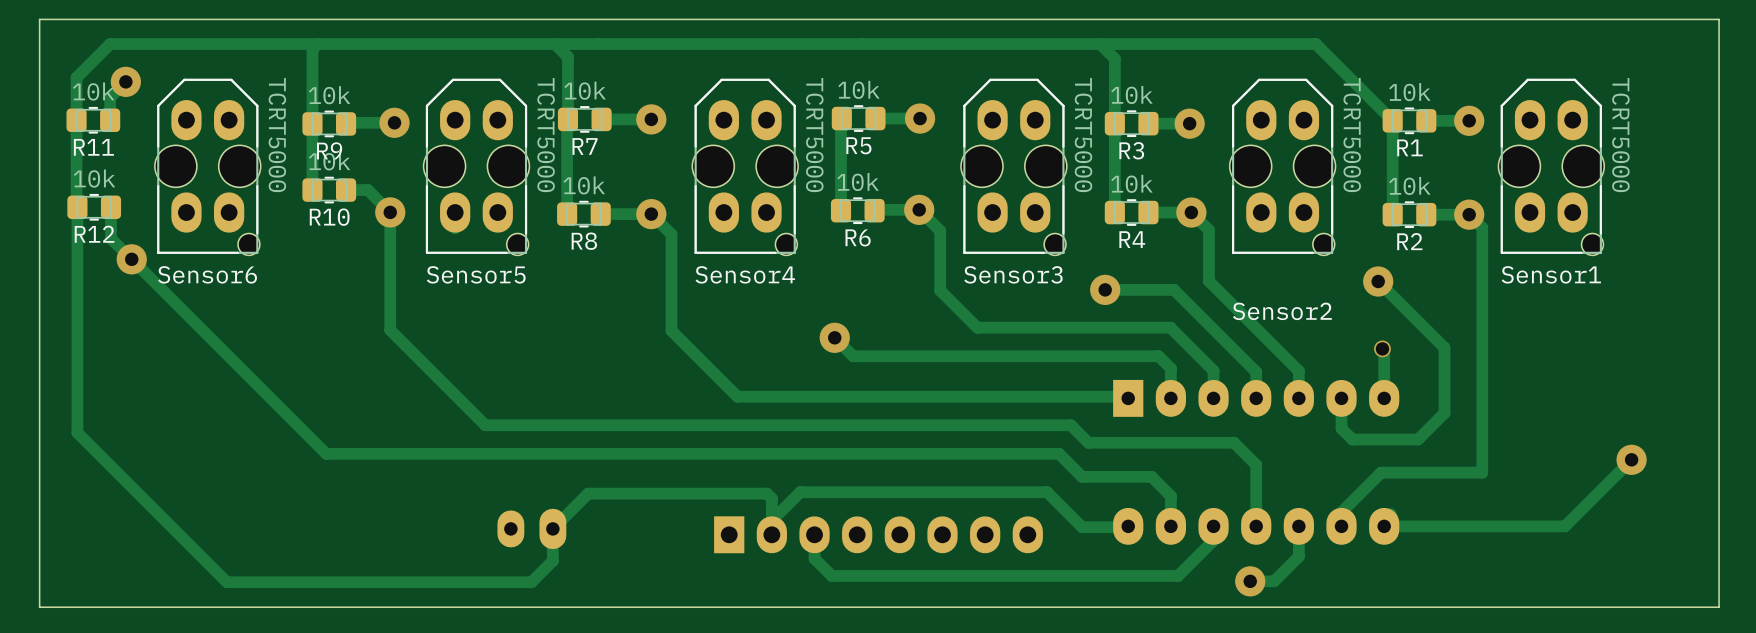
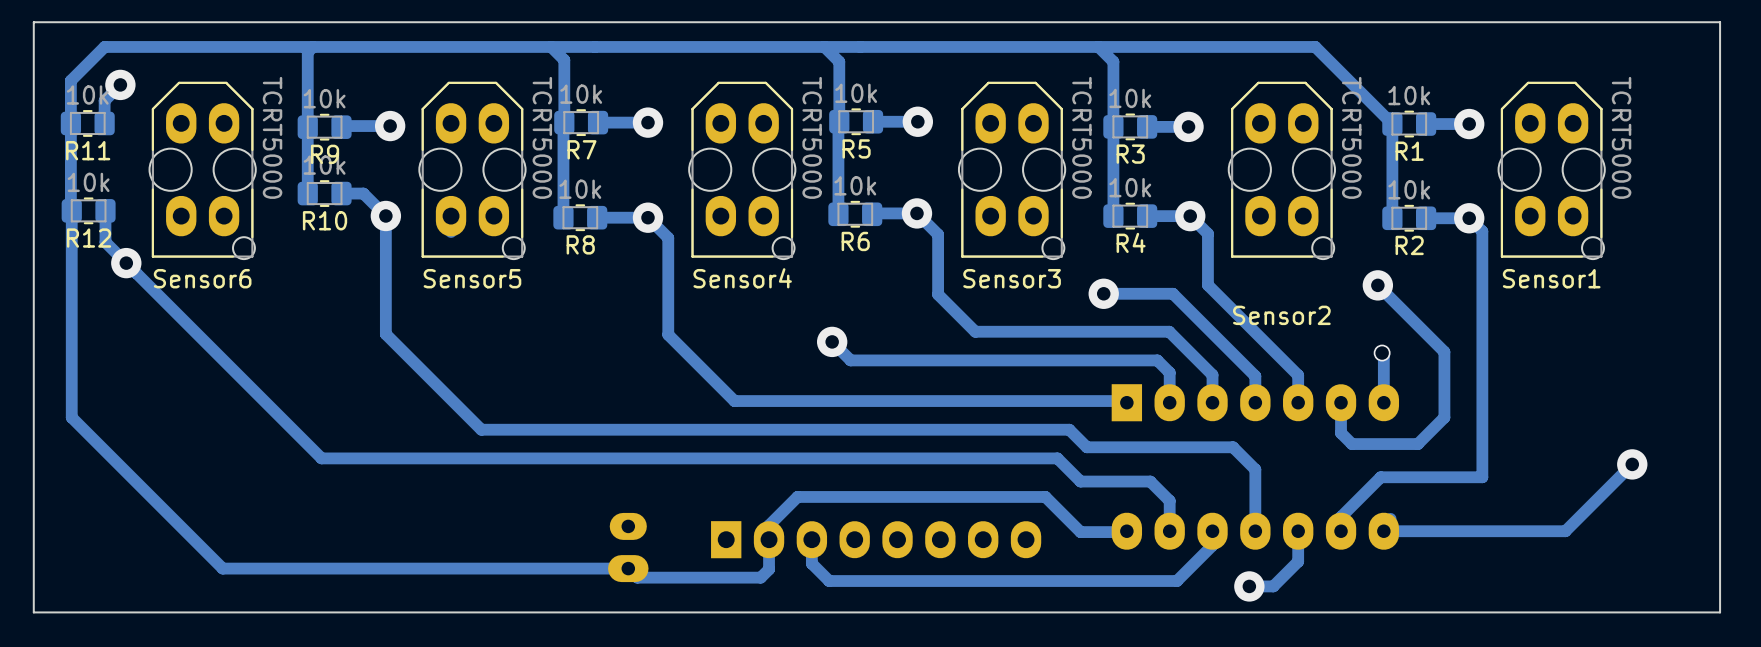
track: none -> (824, 46) (839, 61) (839, 121)
track: (77, 413) (77, 432) (226, 582) (531, 582) (552, 560) (552, 528) (588, 493) (767, 493) (771, 498) (771, 520) -> (71, 417) (222, 568) (628, 568) (637, 577) (760, 577) (769, 569) (769, 539)
part rotation: 0° (531, 528) -> 90° clockwise (628, 547)
part position: (531, 528) -> (628, 547)

